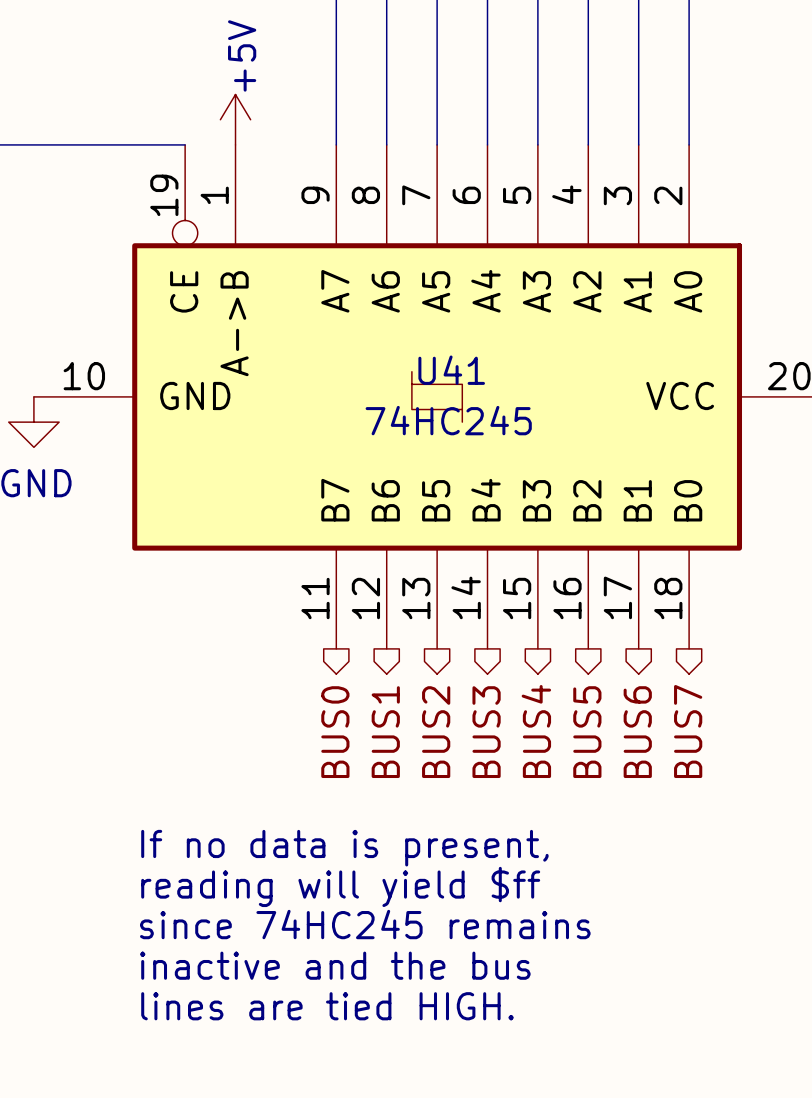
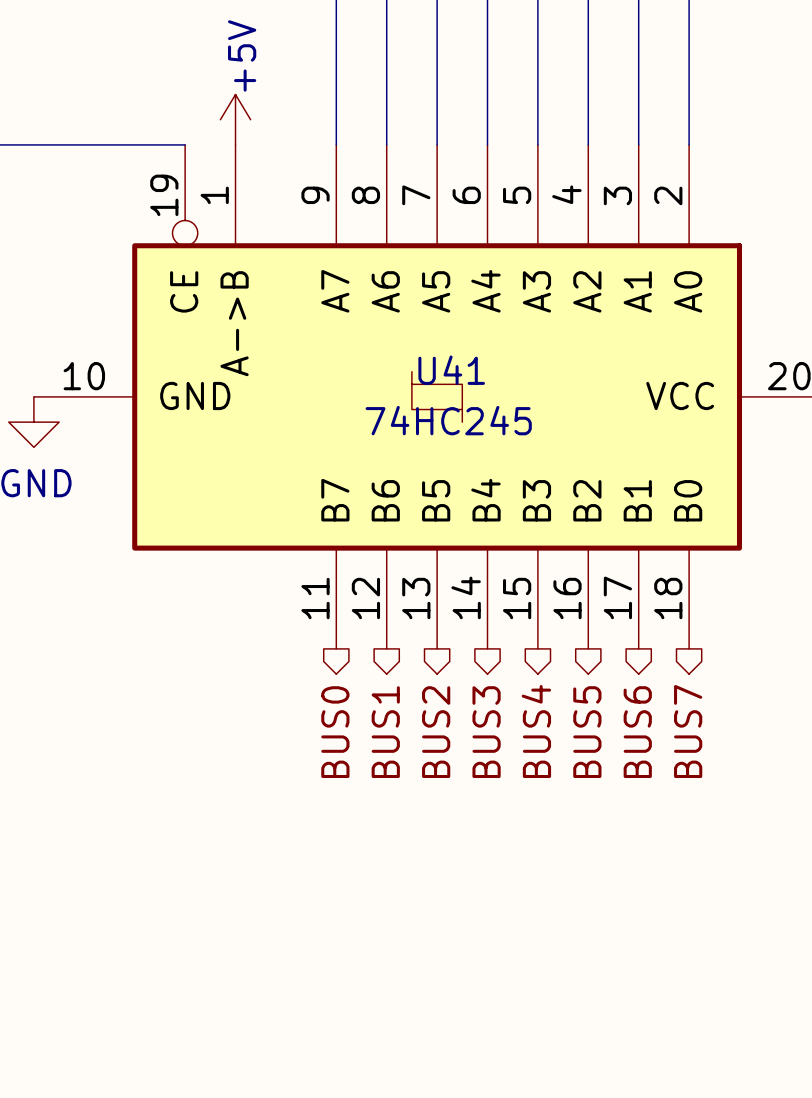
text: If no data is present, (344, 848) -> none
text: reading will yield $ff (340, 886) -> none
text: since 74HC245 remains (365, 924) -> none
text: inactive and the bus (335, 965) -> none
text: lines are tied HIGH. (327, 1006) -> none

